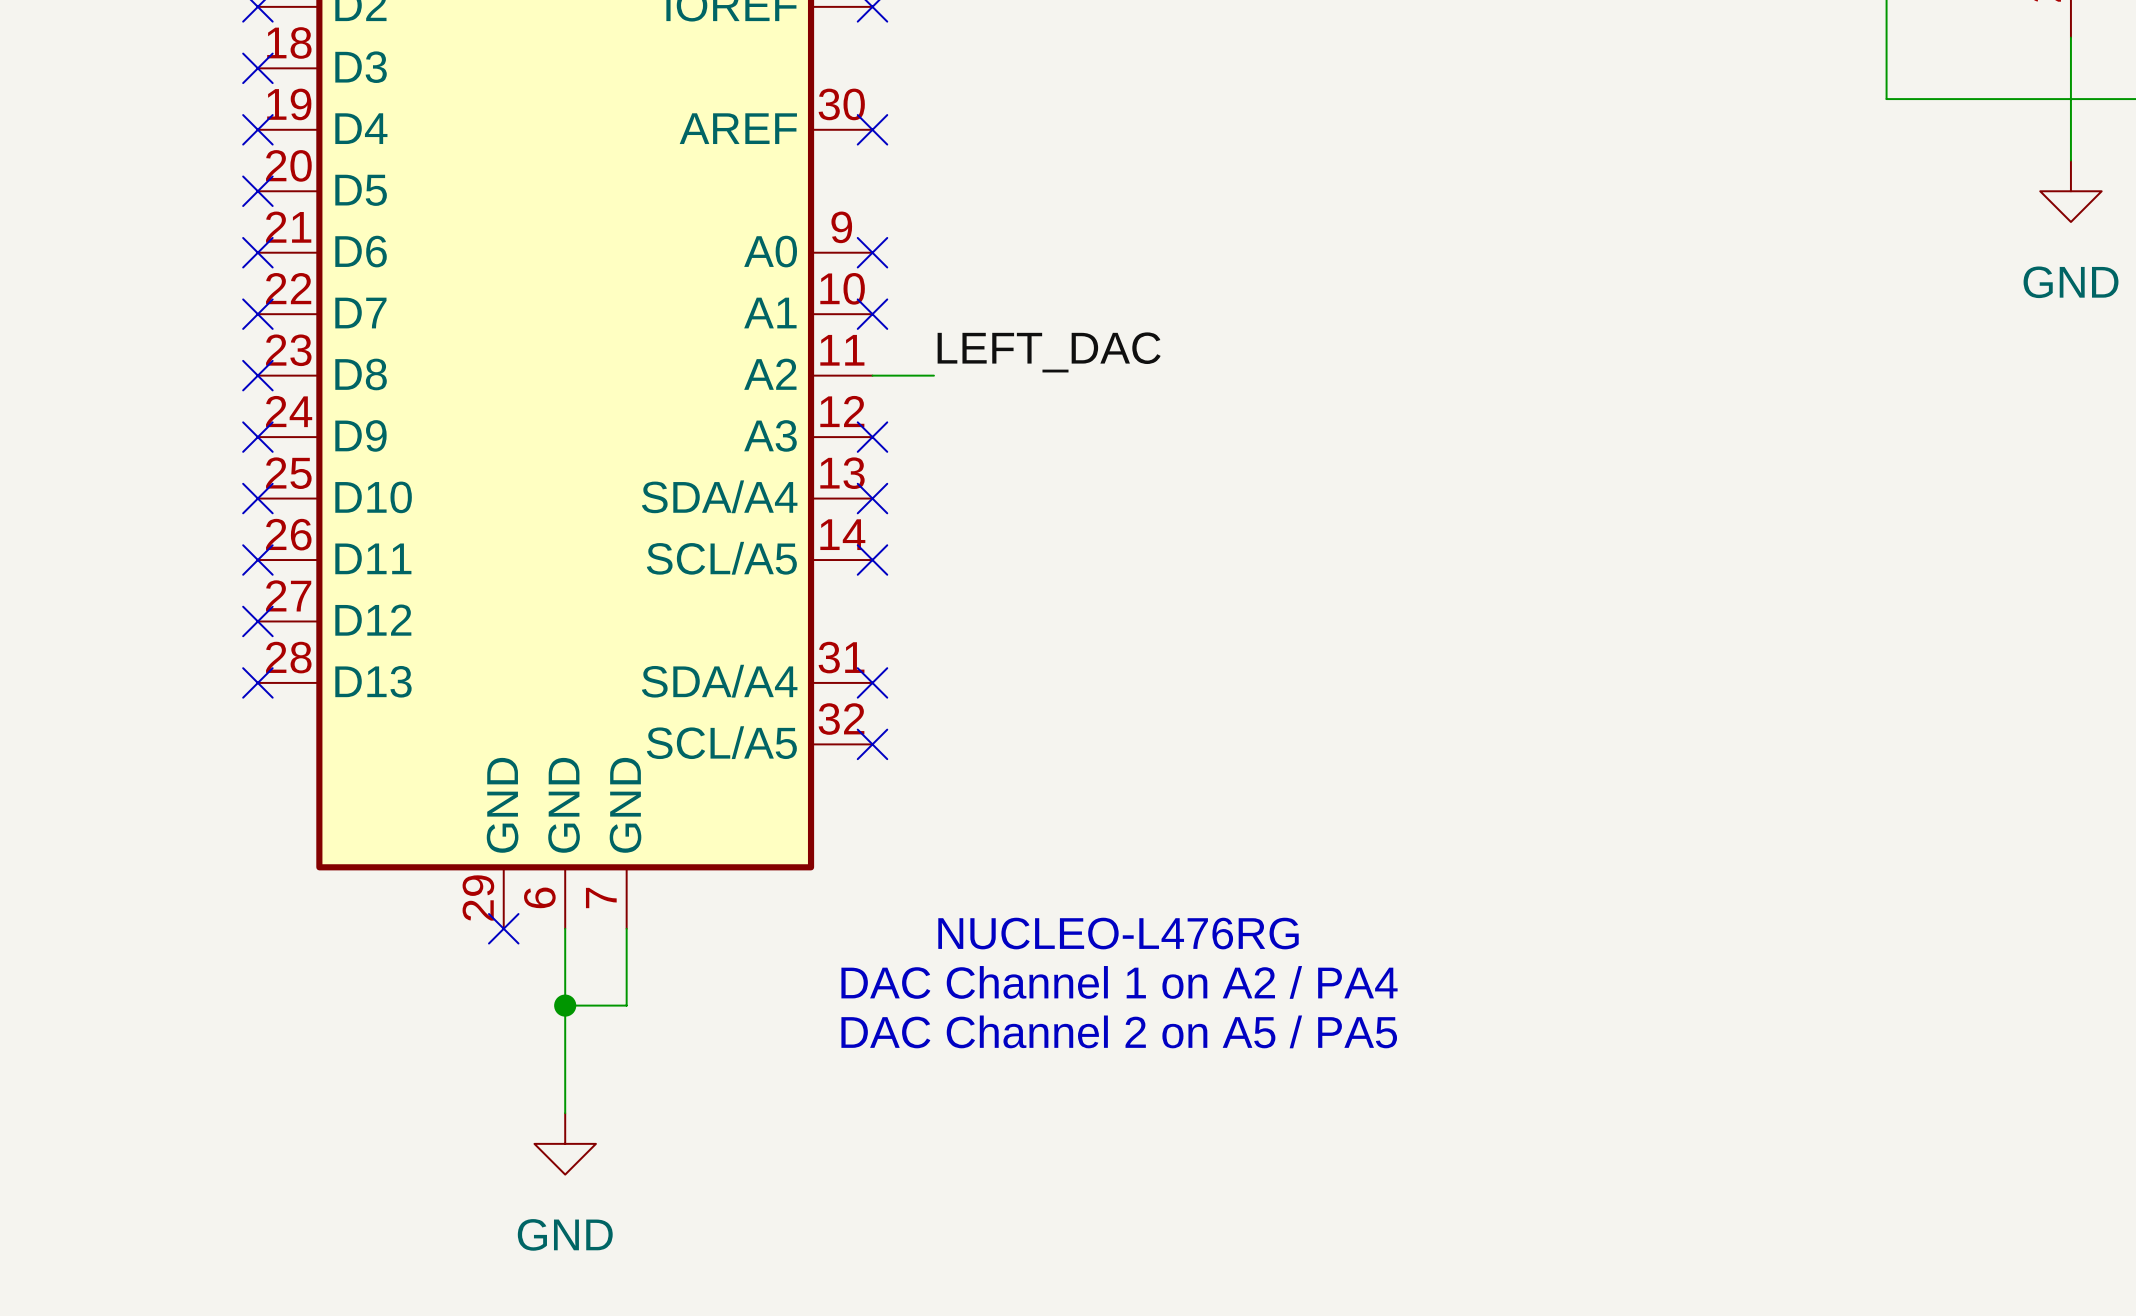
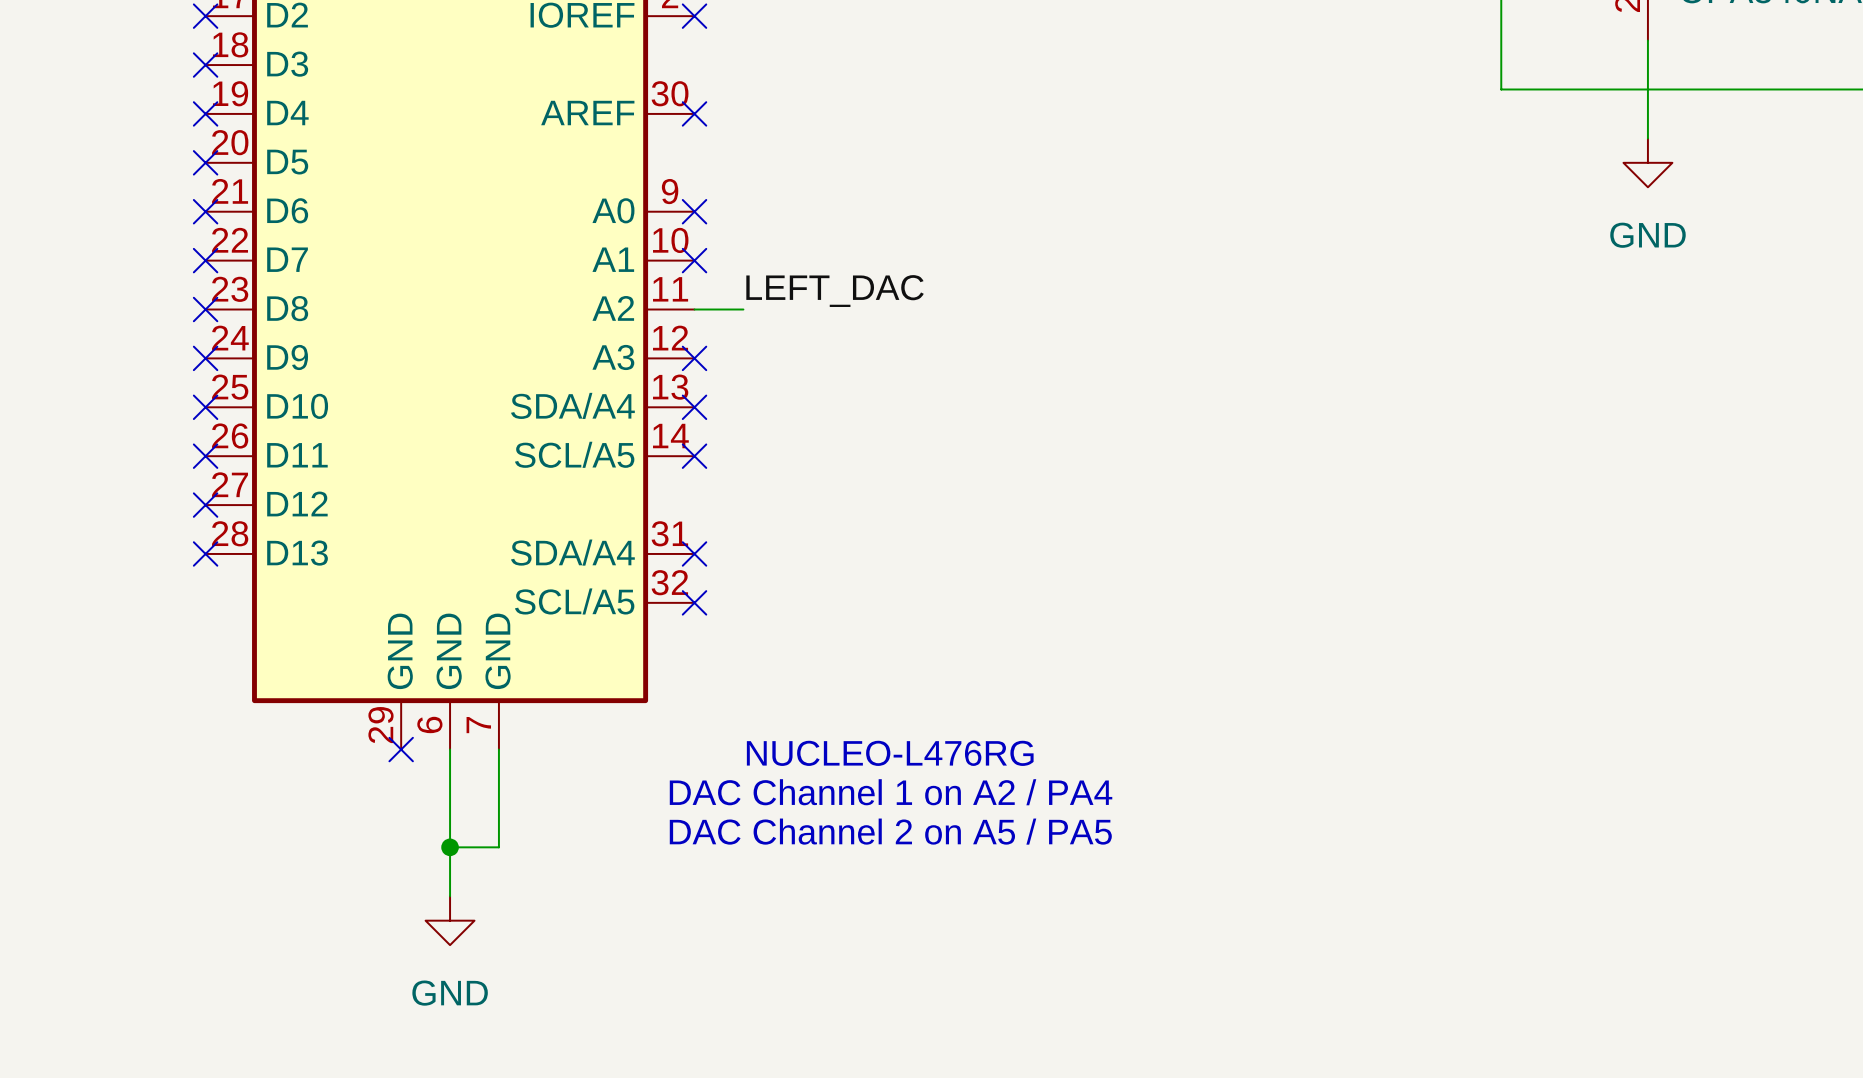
wire: (565, 1005) (626, 1005) -> (450, 847) (498, 847) (498, 810)
junction position: (565, 1005) -> (450, 847)

